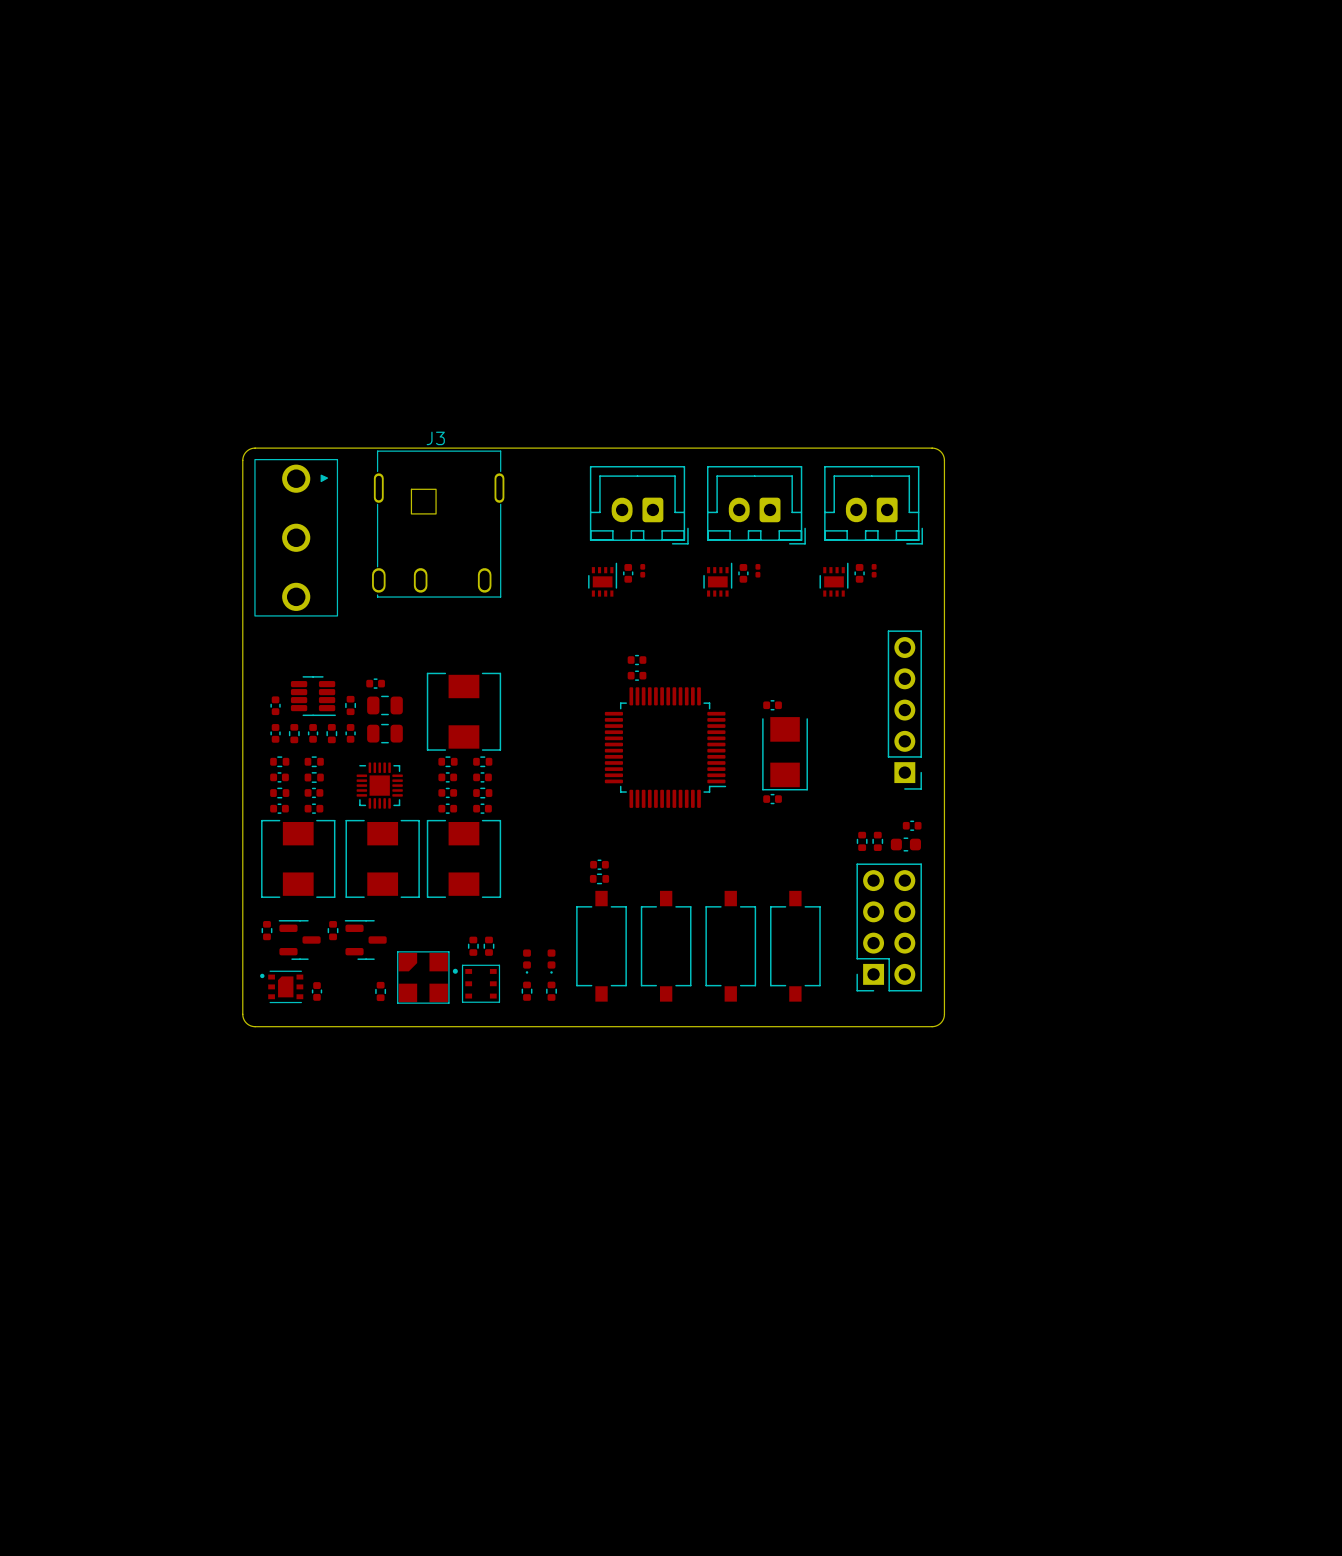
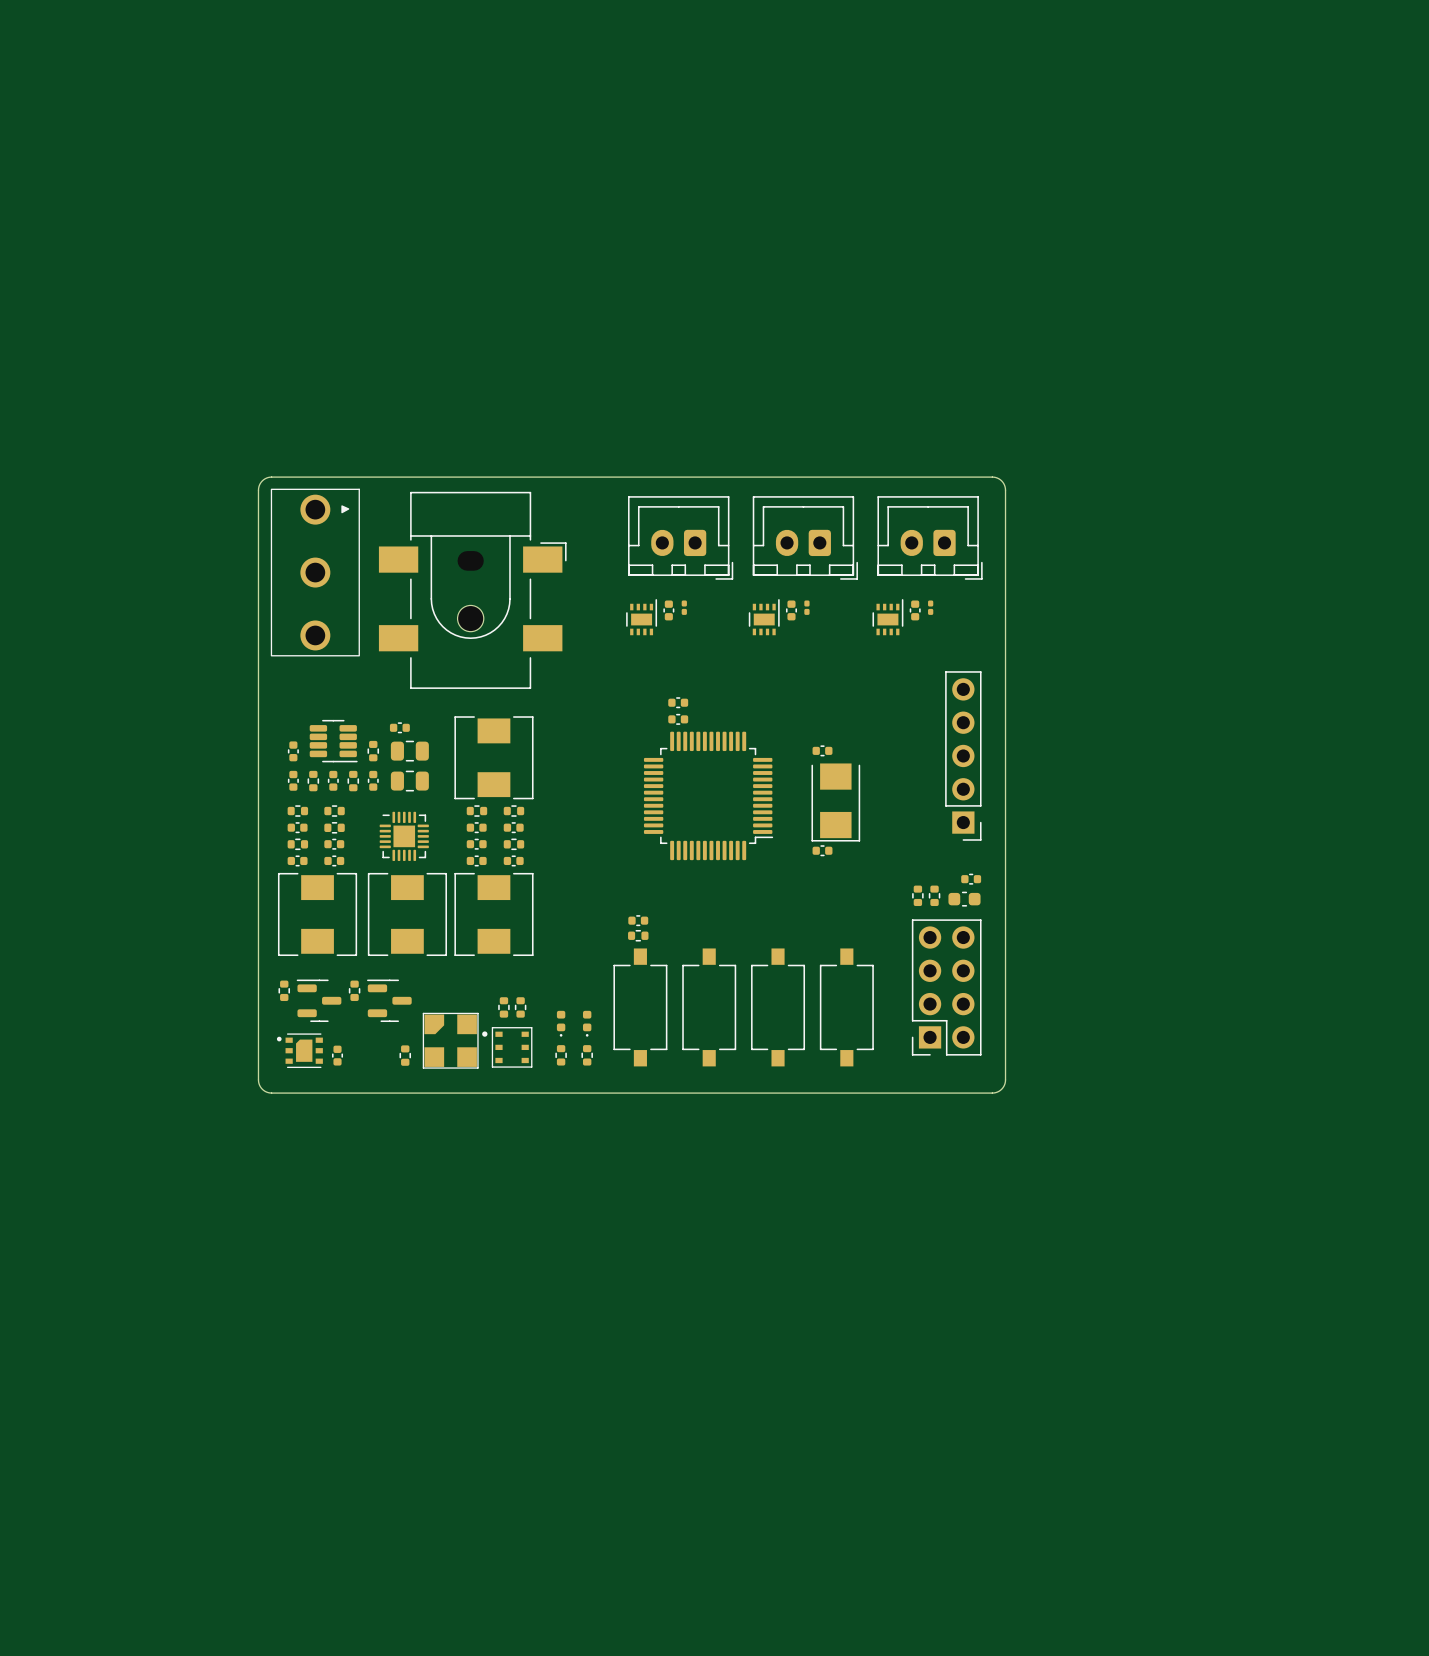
J3: (438, 524) -> none
part: none -> (472, 590)

